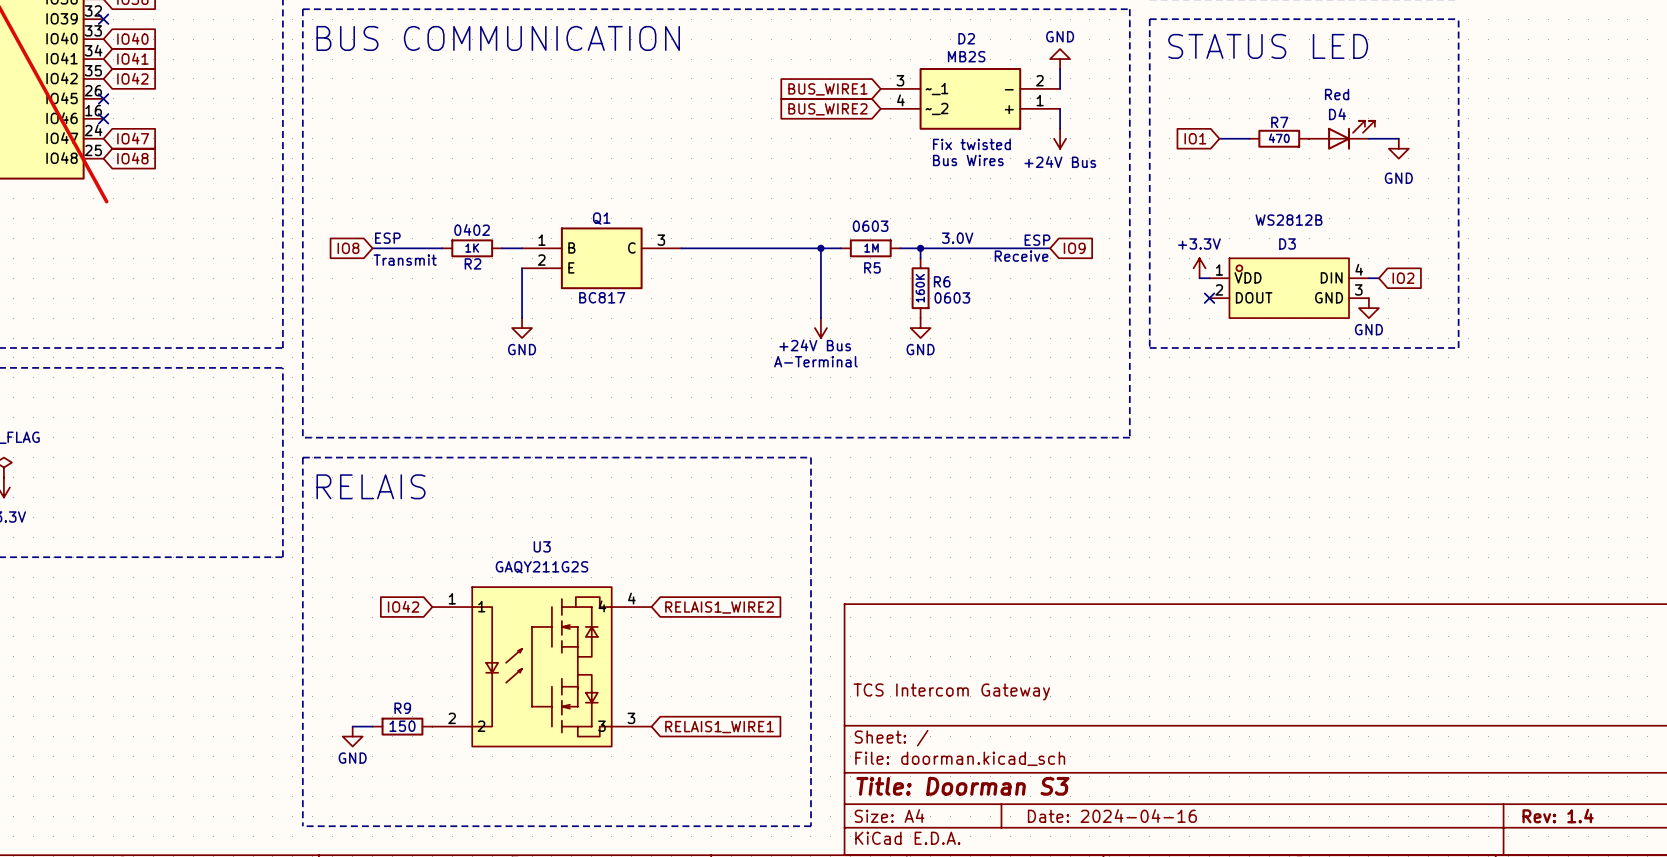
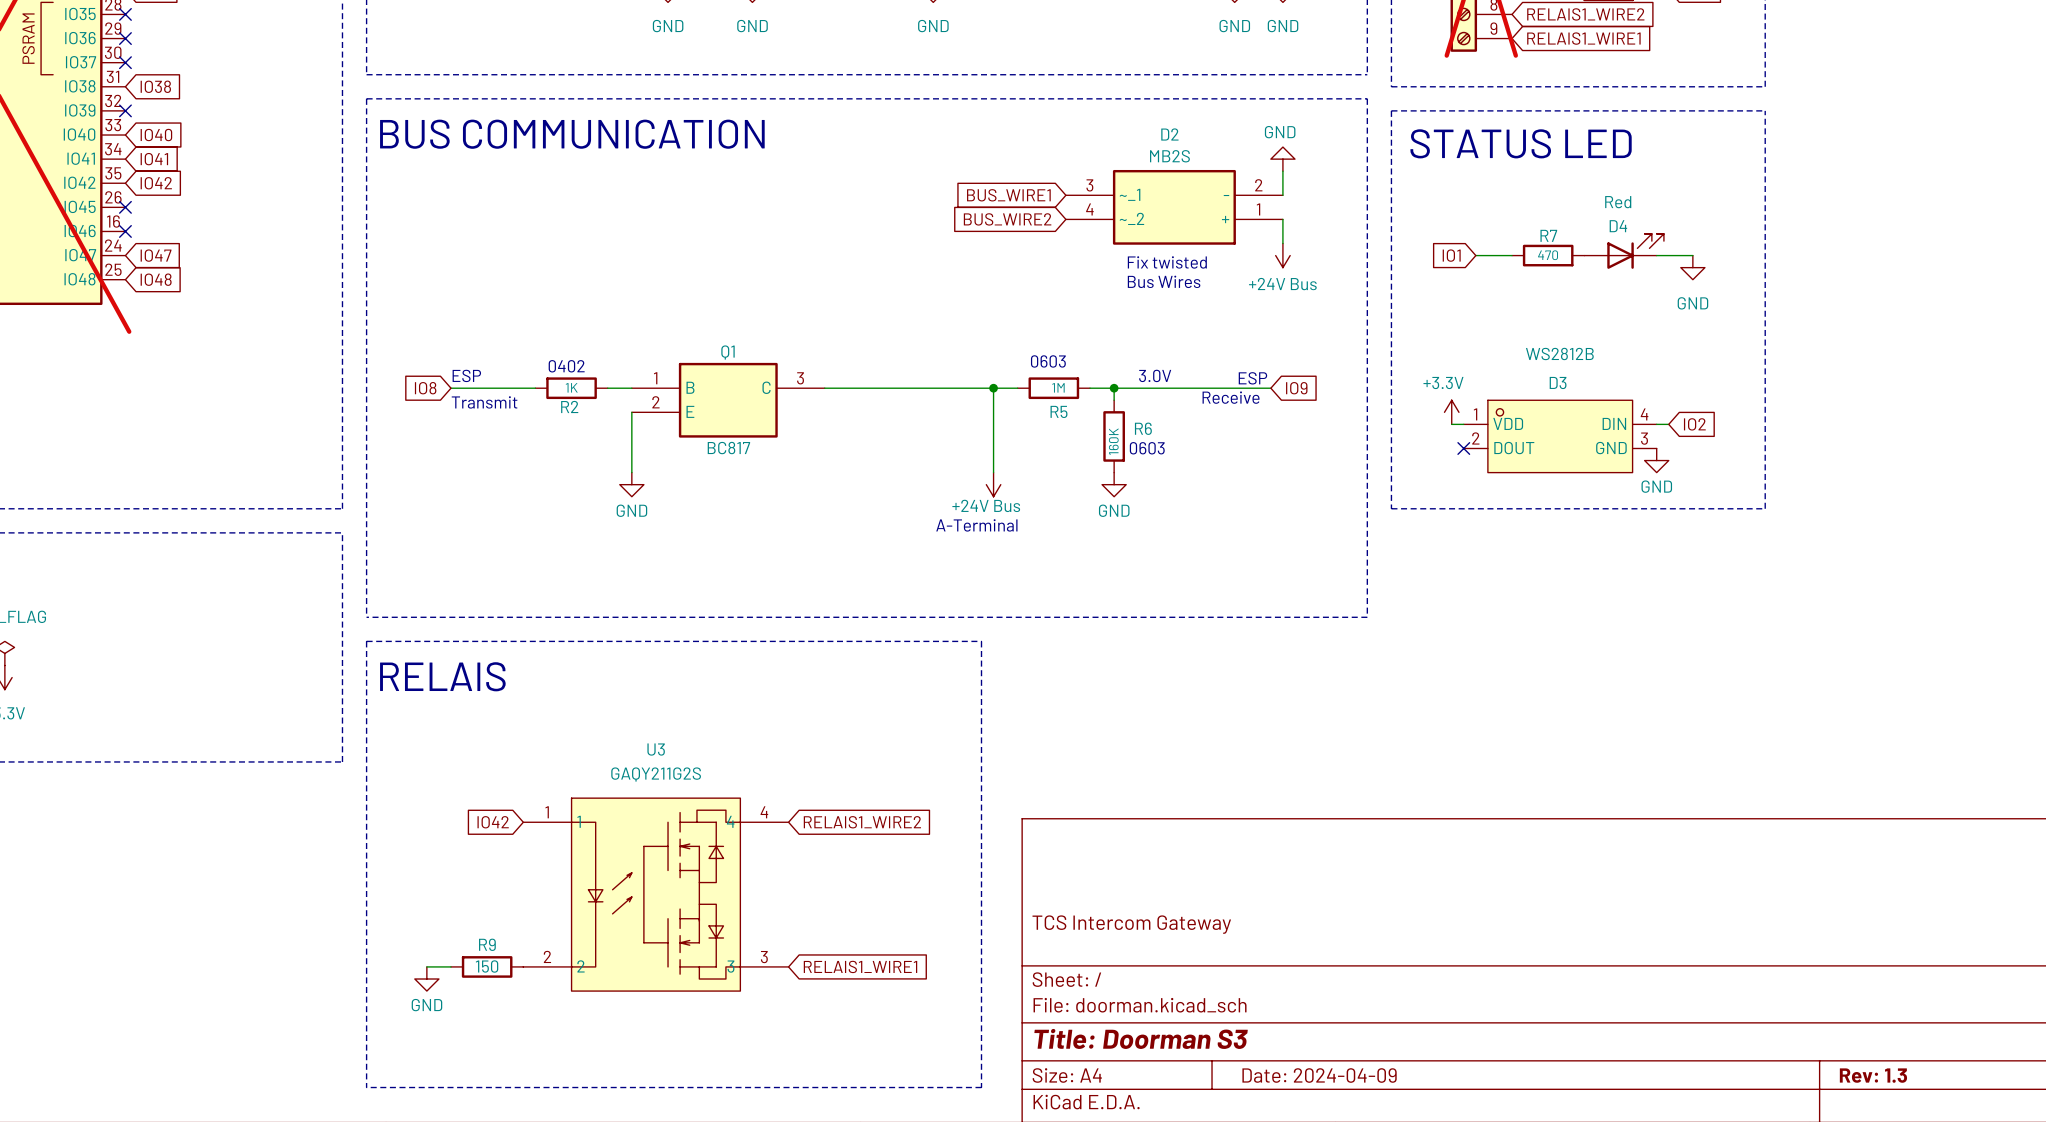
title block: Date: 2024-04-16 (1112, 816) -> Date: 2024-04-09 (1319, 1075)
title block: Rev: 1.4 (1558, 816) -> Rev: 1.3 (1873, 1075)

